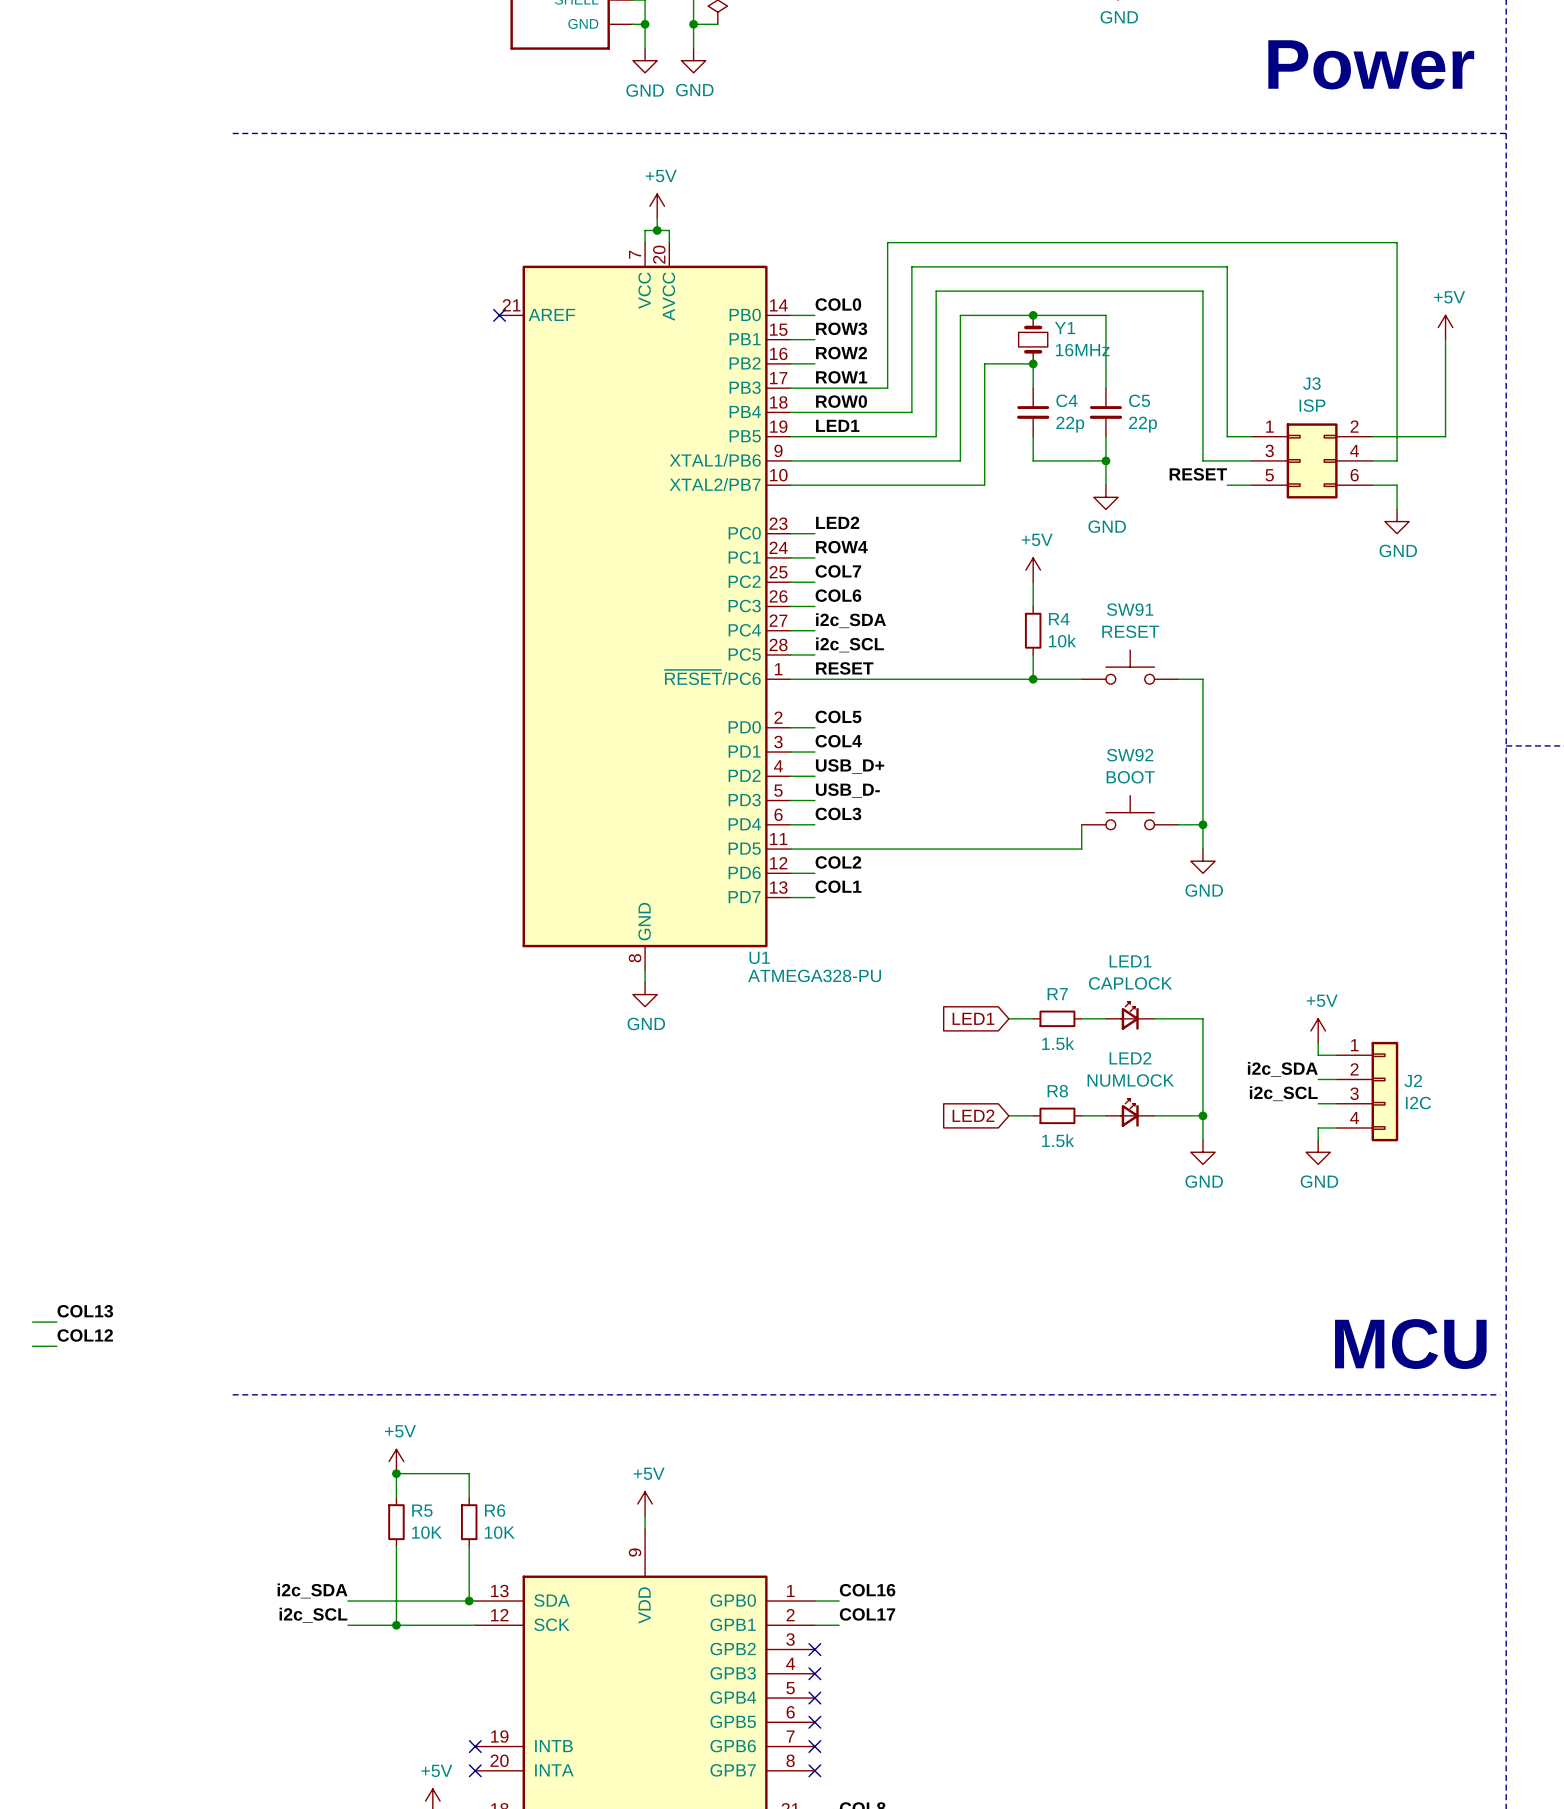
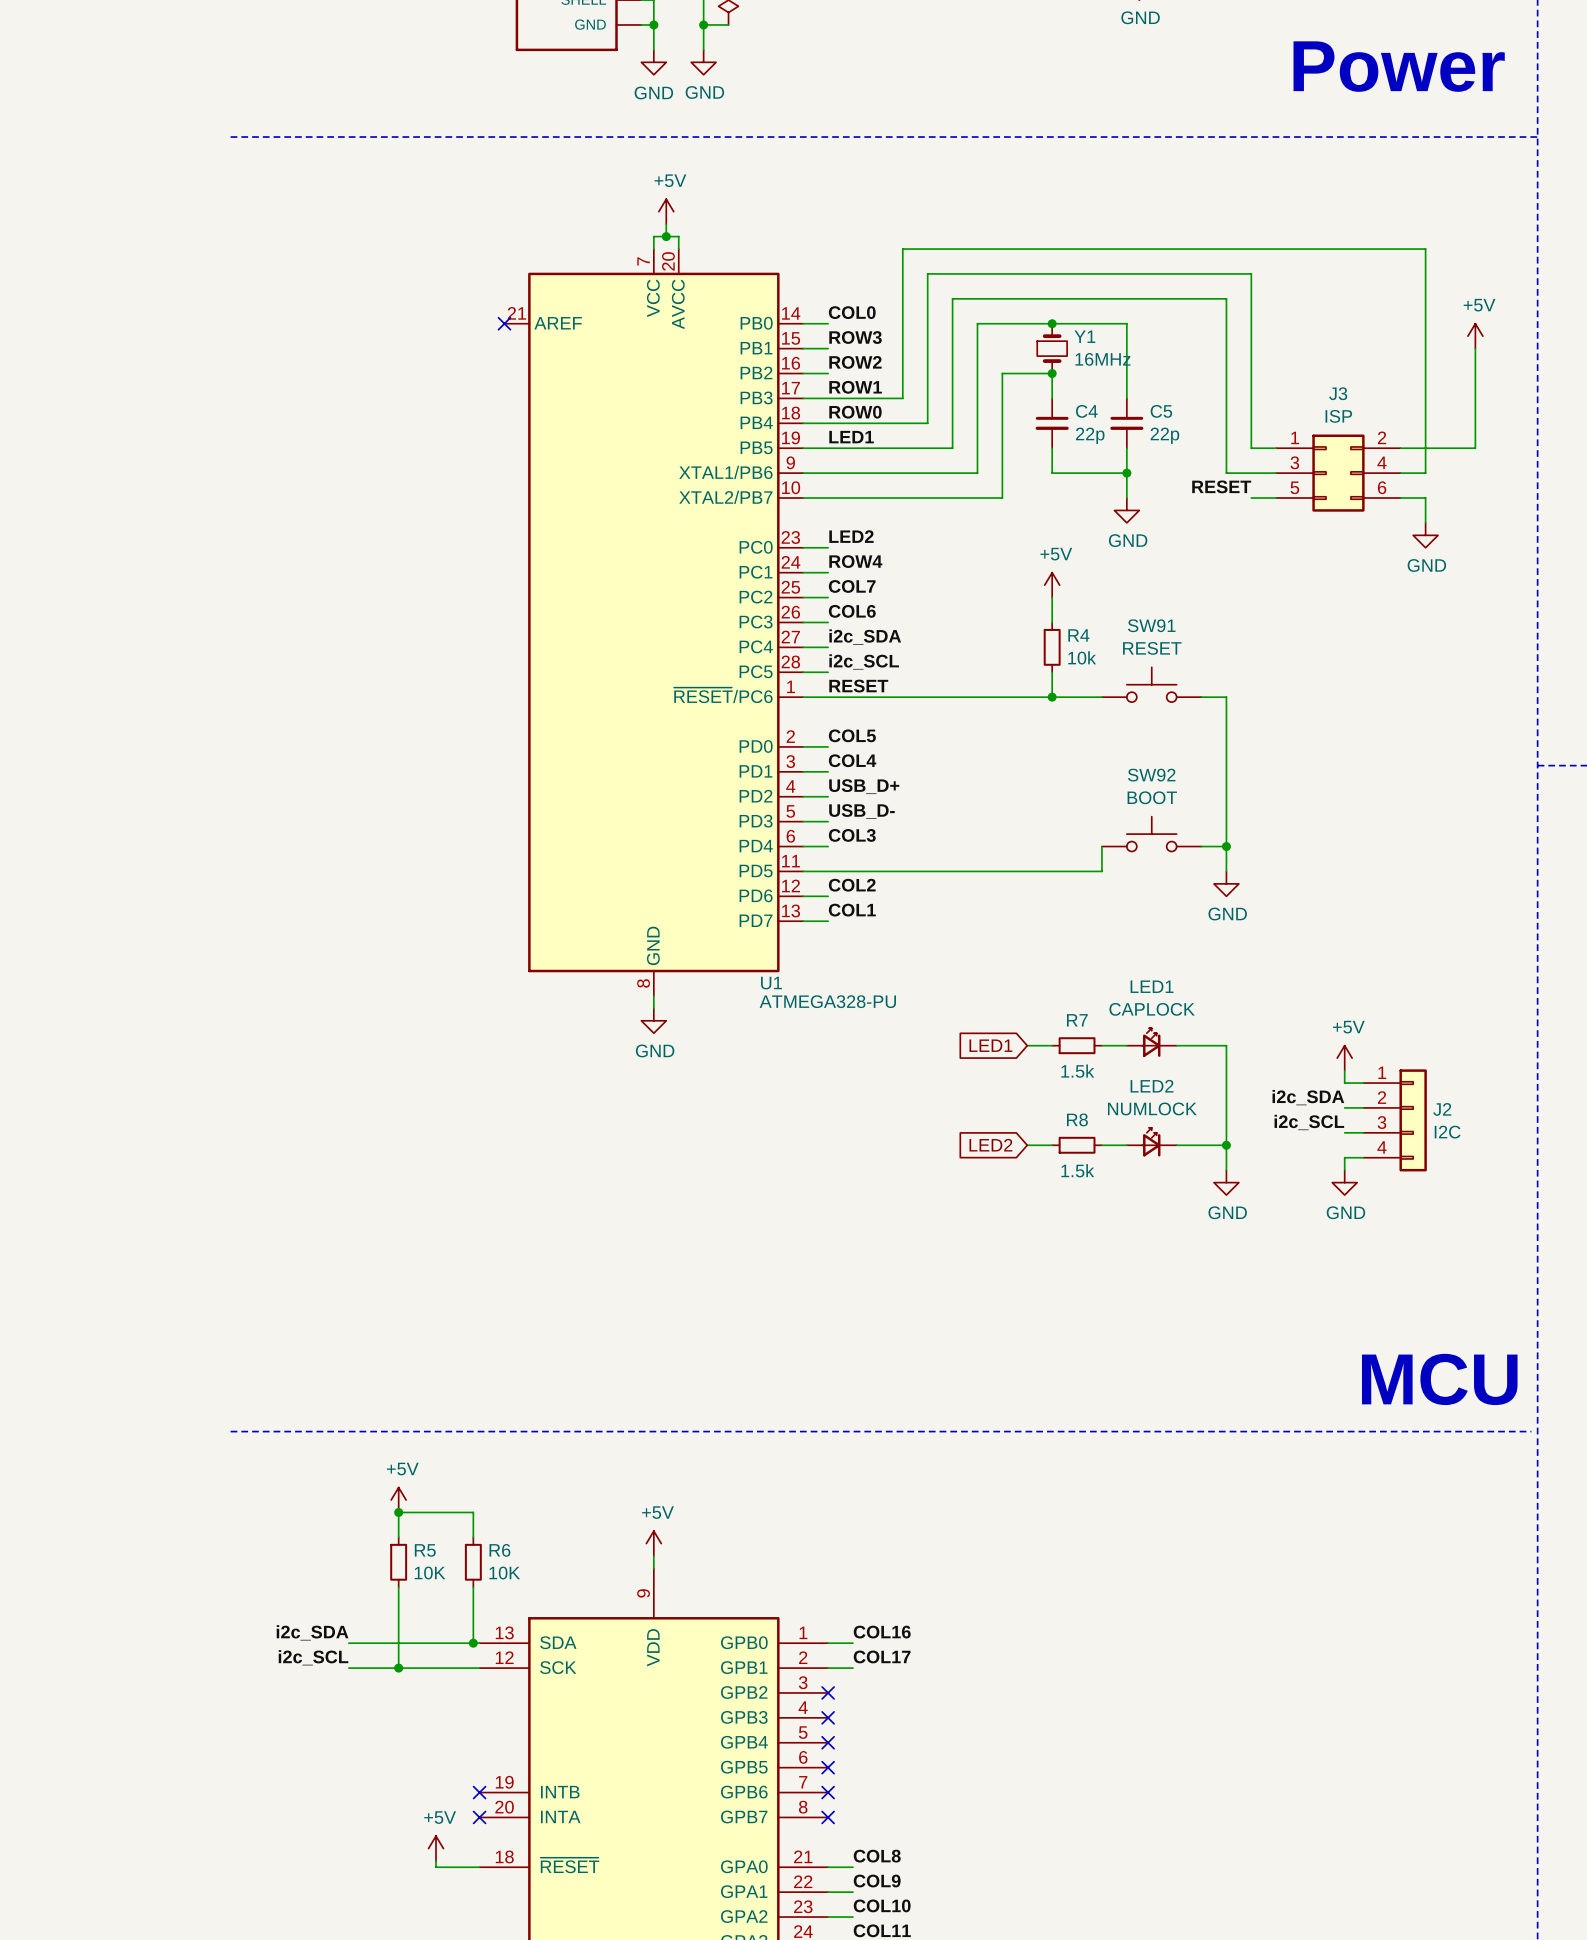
label: COL13 (85, 1311) -> none
wire: (32, 1322) (56, 1322) -> none
label: COL12 (85, 1335) -> none
wire: (32, 1346) (56, 1346) -> none

